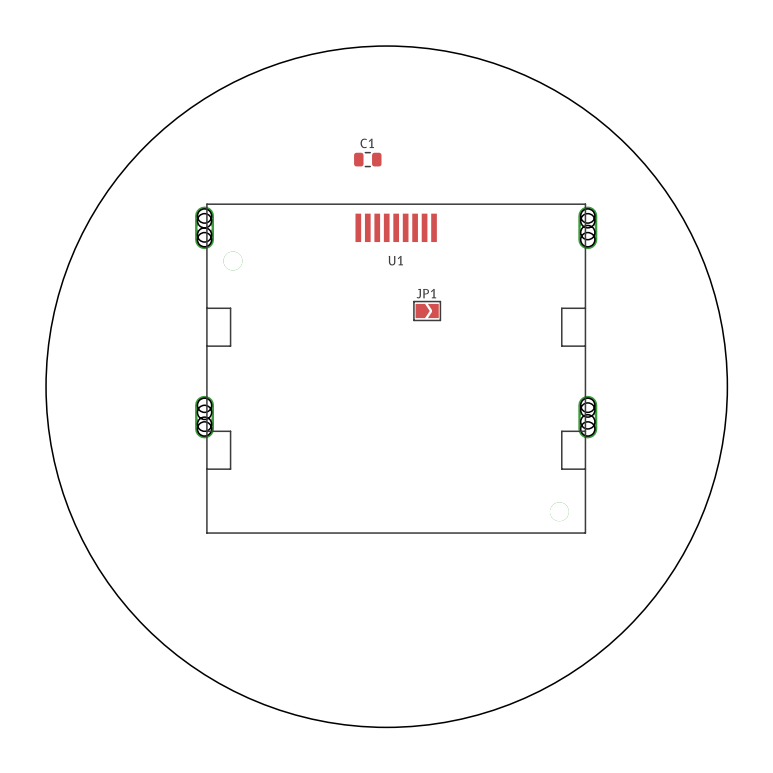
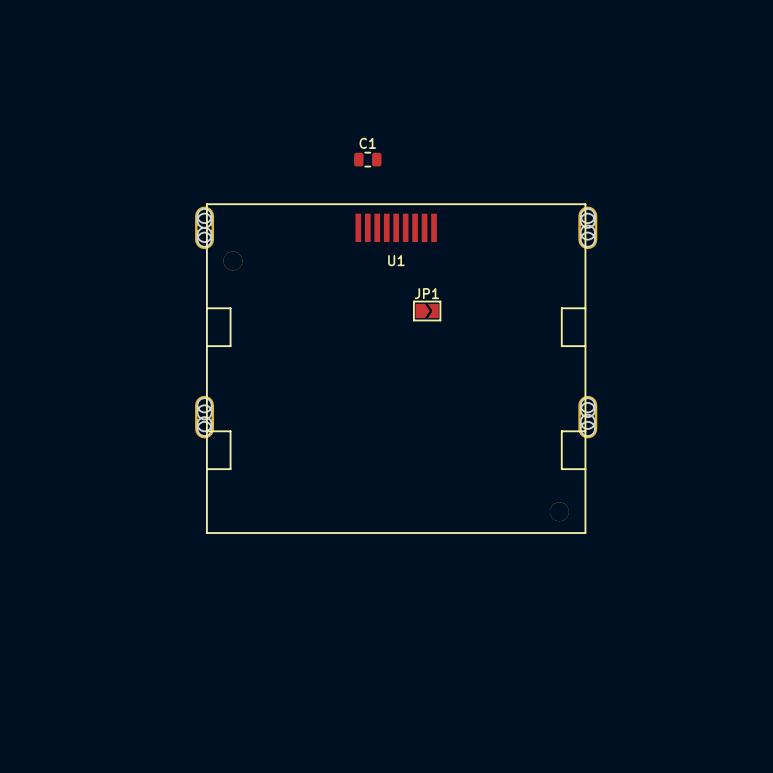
round board edge: [45, 45, 728, 728] -> none

